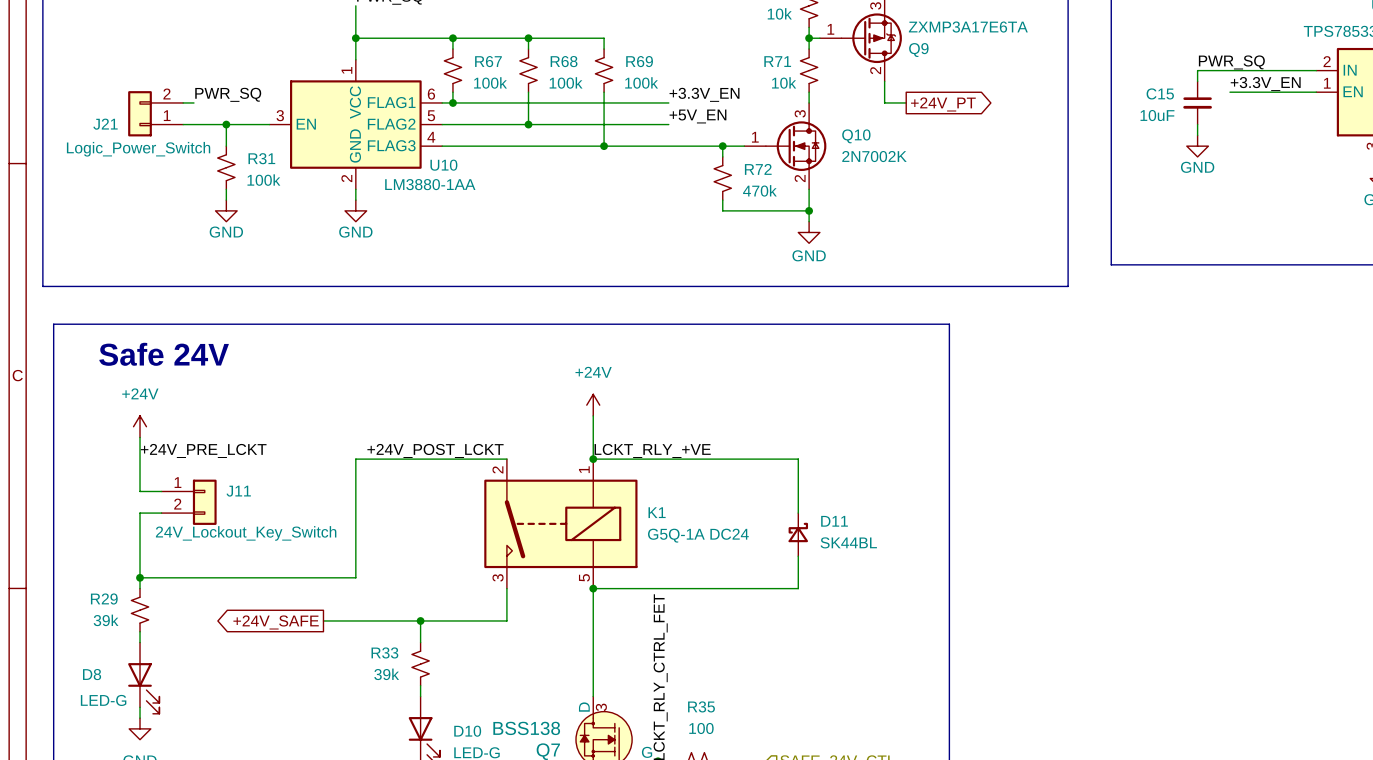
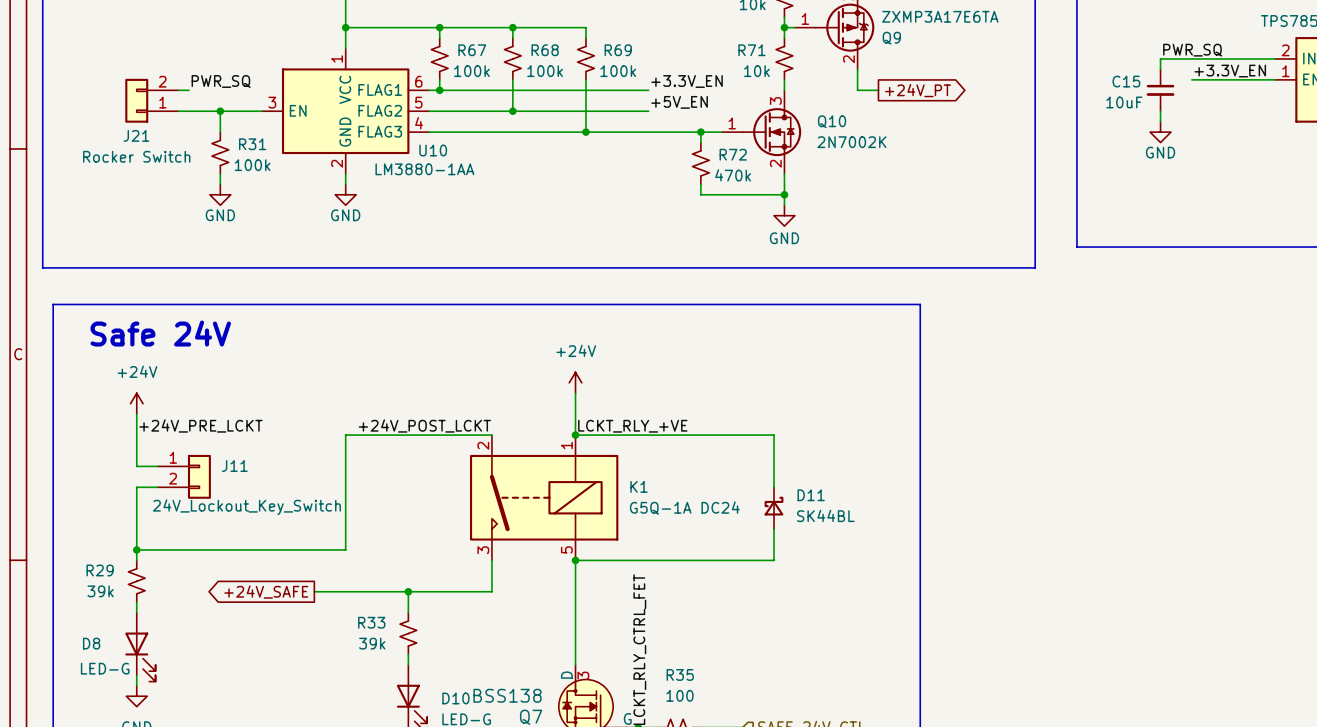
J21 name position: J21 (105, 124) -> J21 (136, 135)
J21 value: Logic_Power_Switch (138, 149) -> Rocker Switch (136, 156)

